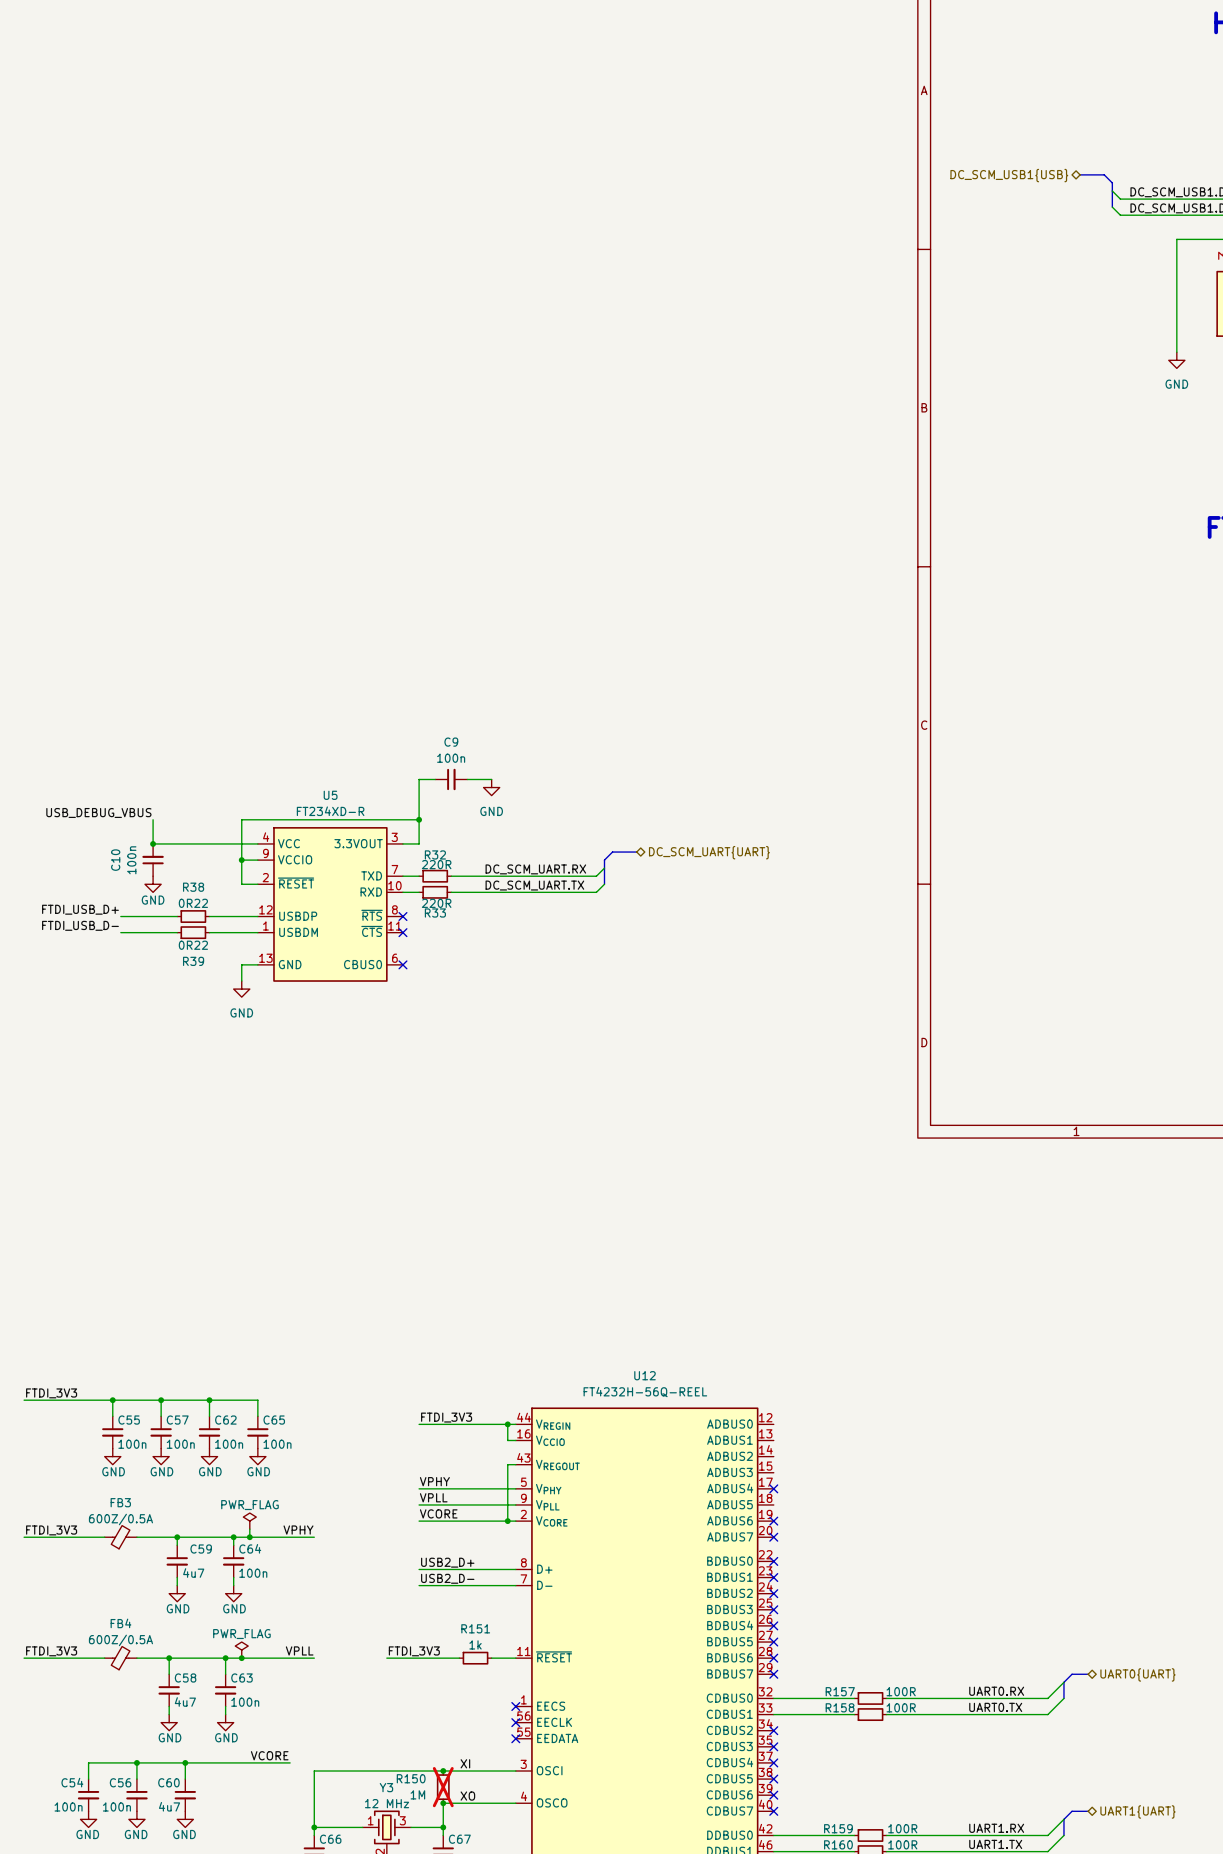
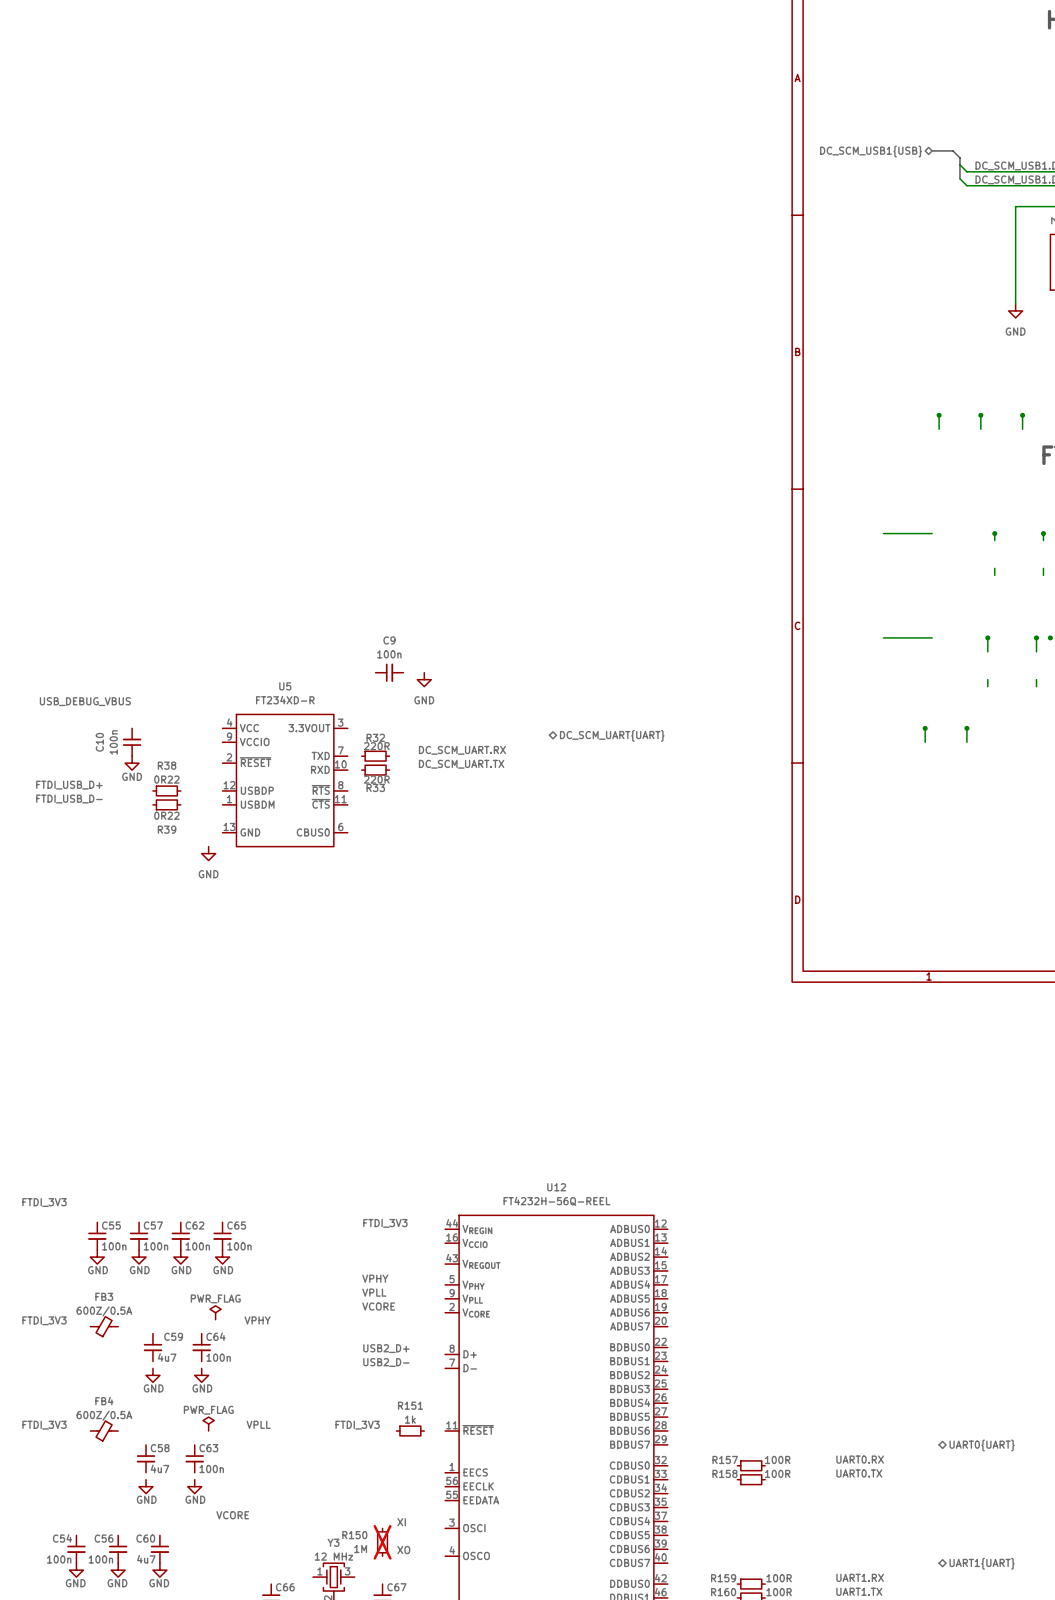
wire: none -> (939, 415) (939, 429)
junction: none -> (939, 415)
wire: none -> (980, 415) (980, 429)
junction: none -> (980, 415)
wire: none -> (1022, 415) (1022, 429)
junction: none -> (1022, 415)
wire: none -> (883, 533) (932, 533)
wire: none -> (994, 533) (994, 540)
junction: none -> (994, 533)
wire: none -> (1043, 533) (1043, 540)
junction: none -> (1043, 533)
wire: none -> (994, 568) (994, 575)
wire: none -> (1043, 568) (1043, 575)
wire: none -> (883, 637) (932, 637)
wire: none -> (987, 637) (987, 651)
junction: none -> (987, 637)
wire: none -> (1036, 637) (1036, 651)
junction: none -> (1036, 637)
junction: none -> (1050, 637)
wire: (435, 779) (419, 779) (419, 843) (402, 843) -> none
wire: (467, 779) (491, 779) -> none
wire: none -> (987, 679) (987, 686)
wire: none -> (1036, 679) (1036, 686)
wire: (153, 819) (153, 843) (257, 843) -> none
wire: (419, 819) (241, 819) (241, 884) (257, 884) -> none
junction: (419, 819) -> none
junction: (153, 843) -> none
wire: none -> (925, 728) (925, 742)
junction: none -> (925, 728)
wire: none -> (966, 728) (966, 742)
junction: none -> (966, 728)
bus: (636, 852) (612, 852) (604, 860) (604, 884) -> none
wire: (241, 860) (257, 860) -> none
junction: (241, 860) -> none
wire: (604, 868) (596, 876) (451, 876) -> none
wire: (402, 876) (419, 876) -> none
wire: (604, 884) (596, 892) (451, 892) -> none
wire: (402, 892) (419, 892) -> none
wire: (120, 916) (177, 916) -> none
wire: (209, 916) (257, 916) -> none
no-connect mark: (402, 916) -> none
wire: (120, 932) (177, 932) -> none
wire: (209, 932) (257, 932) -> none
no-connect mark: (402, 932) -> none
wire: (257, 964) (241, 964) (241, 981) -> none
no-connect mark: (402, 964) -> none
wire: (24, 1400) (257, 1400) (257, 1416) -> none
wire: (112, 1400) (112, 1416) -> none
junction: (112, 1400) -> none
wire: (161, 1400) (161, 1416) -> none
junction: (161, 1400) -> none
wire: (209, 1400) (209, 1416) -> none
junction: (209, 1400) -> none
wire: (419, 1424) (515, 1424) -> none
wire: (507, 1424) (507, 1440) (515, 1440) -> none
junction: (507, 1424) -> none
wire: (515, 1464) (507, 1464) (507, 1521) -> none
wire: (419, 1488) (515, 1488) -> none
no-connect mark: (773, 1488) -> none
wire: (419, 1504) (515, 1504) -> none
wire: (419, 1521) (515, 1521) -> none
junction: (507, 1521) -> none
no-connect mark: (773, 1521) -> none
wire: (249, 1529) (249, 1537) -> none
wire: (24, 1537) (104, 1537) -> none
wire: (136, 1537) (314, 1537) -> none
wire: (177, 1537) (177, 1545) -> none
junction: (177, 1537) -> none
wire: (233, 1537) (233, 1545) -> none
junction: (233, 1537) -> none
junction: (249, 1537) -> none
no-connect mark: (773, 1537) -> none
no-connect mark: (773, 1561) -> none
wire: (419, 1569) (515, 1569) -> none
wire: (177, 1577) (177, 1585) -> none
wire: (233, 1577) (233, 1585) -> none
no-connect mark: (773, 1577) -> none
wire: (419, 1585) (515, 1585) -> none
no-connect mark: (773, 1593) -> none
no-connect mark: (773, 1609) -> none
no-connect mark: (773, 1625) -> none
no-connect mark: (773, 1642) -> none
wire: (24, 1658) (104, 1658) -> none
wire: (136, 1658) (314, 1658) -> none
wire: (169, 1658) (169, 1674) -> none
junction: (169, 1658) -> none
wire: (225, 1658) (225, 1674) -> none
junction: (225, 1658) -> none
junction: (241, 1658) -> none
wire: (386, 1658) (459, 1658) -> none
wire: (491, 1658) (515, 1658) -> none
no-connect mark: (773, 1658) -> none
no-connect mark: (773, 1674) -> none
bus: (1088, 1674) (1072, 1674) (1063, 1682) (1063, 1698) -> none
wire: (1063, 1682) (1047, 1698) (886, 1698) -> none
wire: (773, 1698) (854, 1698) -> none
wire: (1063, 1698) (1047, 1714) (886, 1714) -> none
wire: (169, 1706) (169, 1714) -> none
wire: (225, 1706) (225, 1714) -> none
no-connect mark: (515, 1706) -> none
wire: (773, 1714) (854, 1714) -> none
no-connect mark: (515, 1722) -> none
no-connect mark: (773, 1730) -> none
no-connect mark: (515, 1738) -> none
no-connect mark: (773, 1746) -> none
wire: (136, 1762) (136, 1779) -> none
junction: (136, 1762) -> none
wire: (185, 1762) (185, 1779) -> none
junction: (185, 1762) -> none
wire: (290, 1762) (88, 1762) (88, 1779) -> none
no-connect mark: (773, 1762) -> none
junction: (443, 1771) -> none
wire: (515, 1771) (314, 1771) (314, 1835) -> none
no-connect mark: (773, 1779) -> none
no-connect mark: (773, 1795) -> none
junction: (443, 1803) -> none
wire: (515, 1803) (443, 1803) (443, 1835) -> none
no-connect mark: (773, 1811) -> none
bus: (1088, 1811) (1072, 1811) (1063, 1819) (1063, 1835) -> none
wire: (1063, 1819) (1047, 1835) (886, 1835) -> none
wire: (314, 1827) (362, 1827) -> none
junction: (314, 1827) -> none
wire: (411, 1827) (443, 1827) -> none
junction: (443, 1827) -> none
wire: (773, 1835) (854, 1835) -> none
wire: (1063, 1835) (1047, 1851) (886, 1851) -> none
wire: (773, 1851) (854, 1851) -> none

